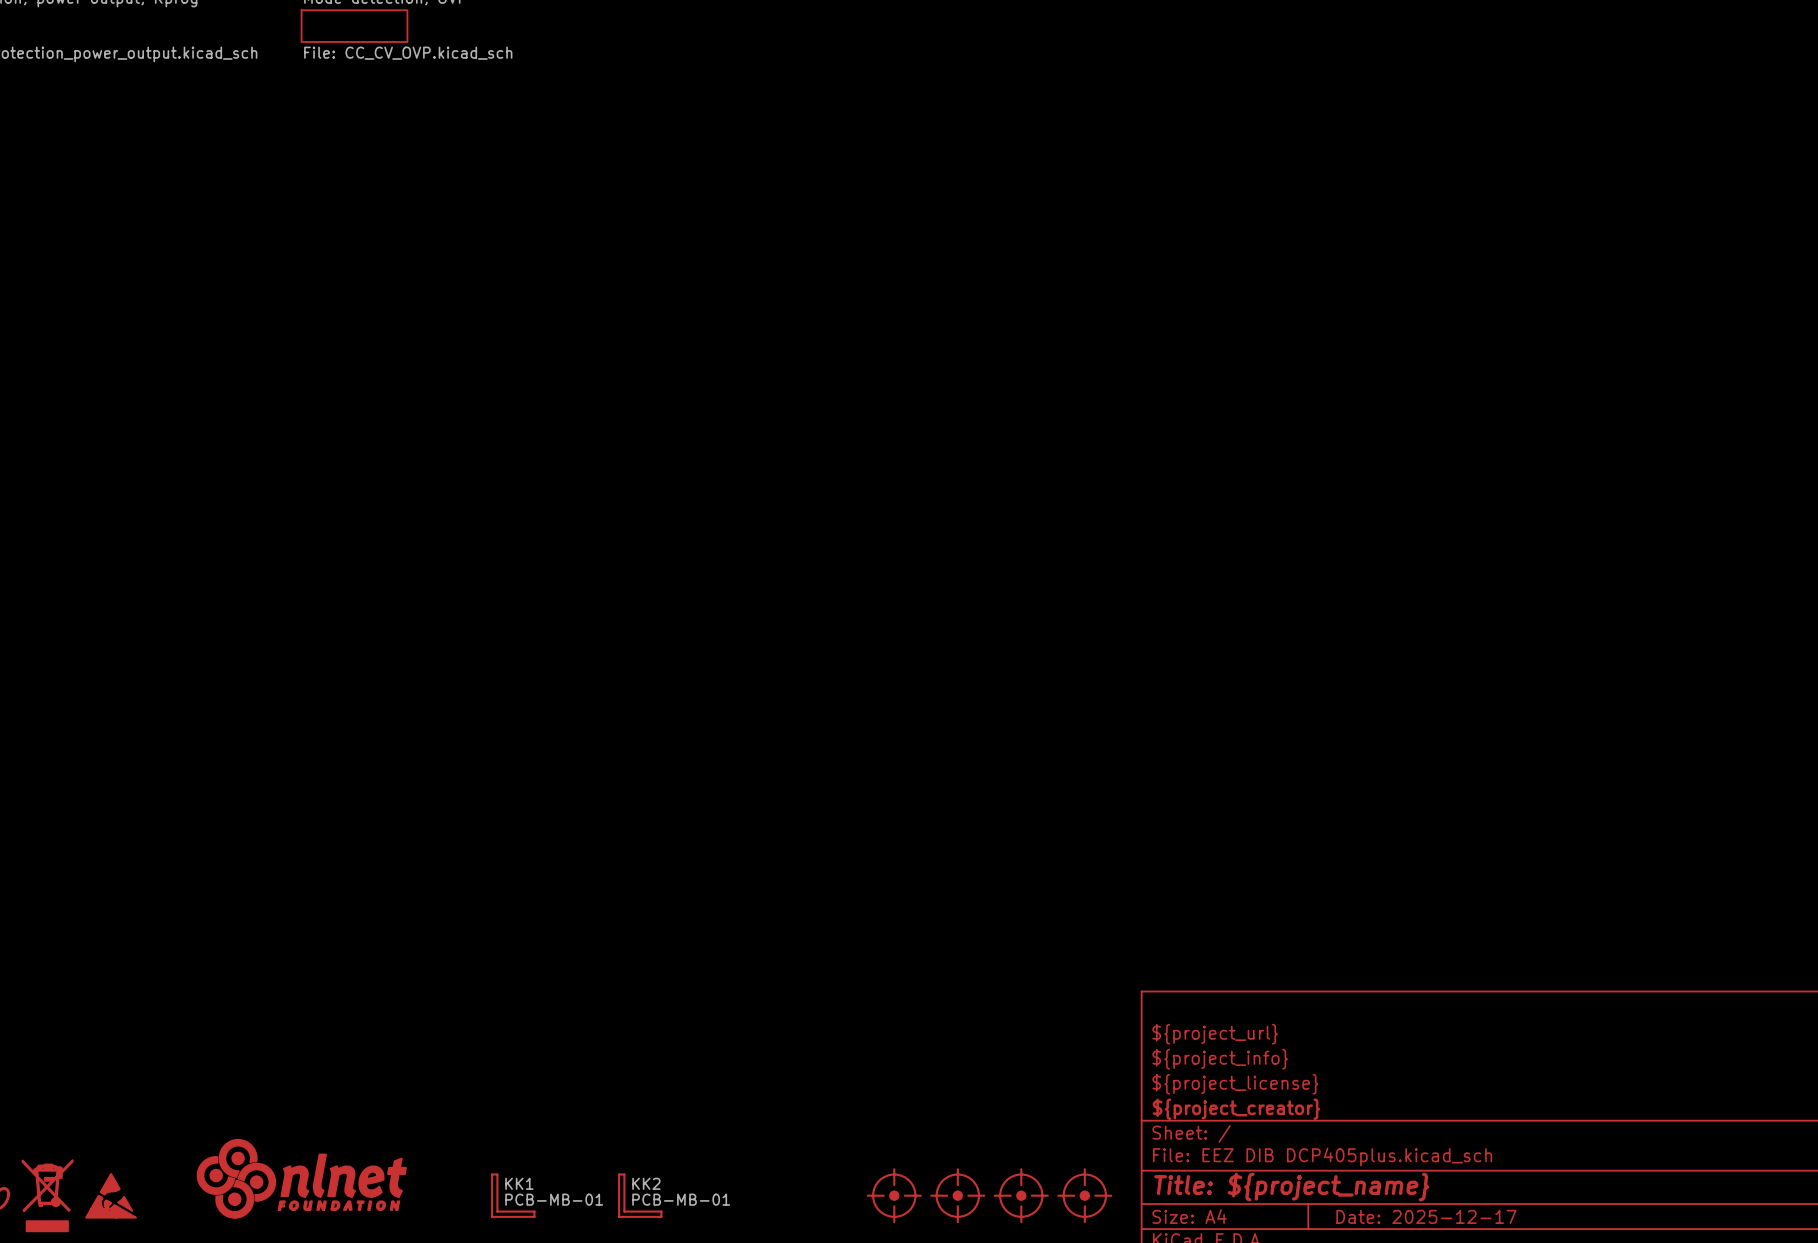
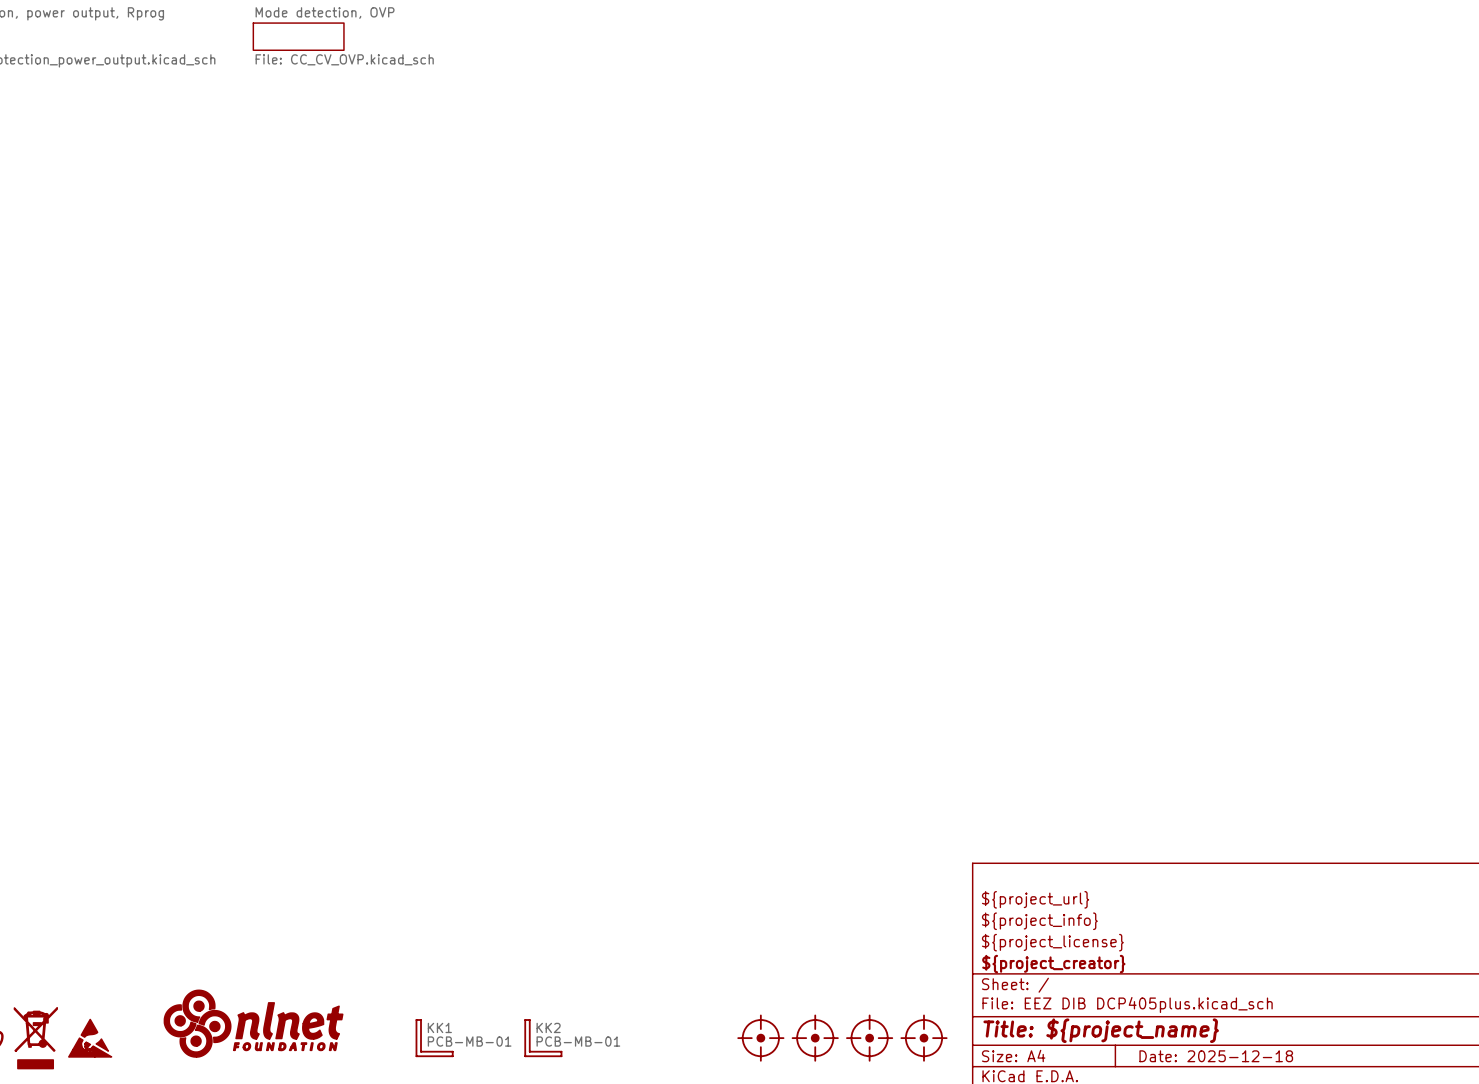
title block: Date: 2025-12-17 (1426, 1216) -> Date: 2025-12-18 (1216, 1056)

